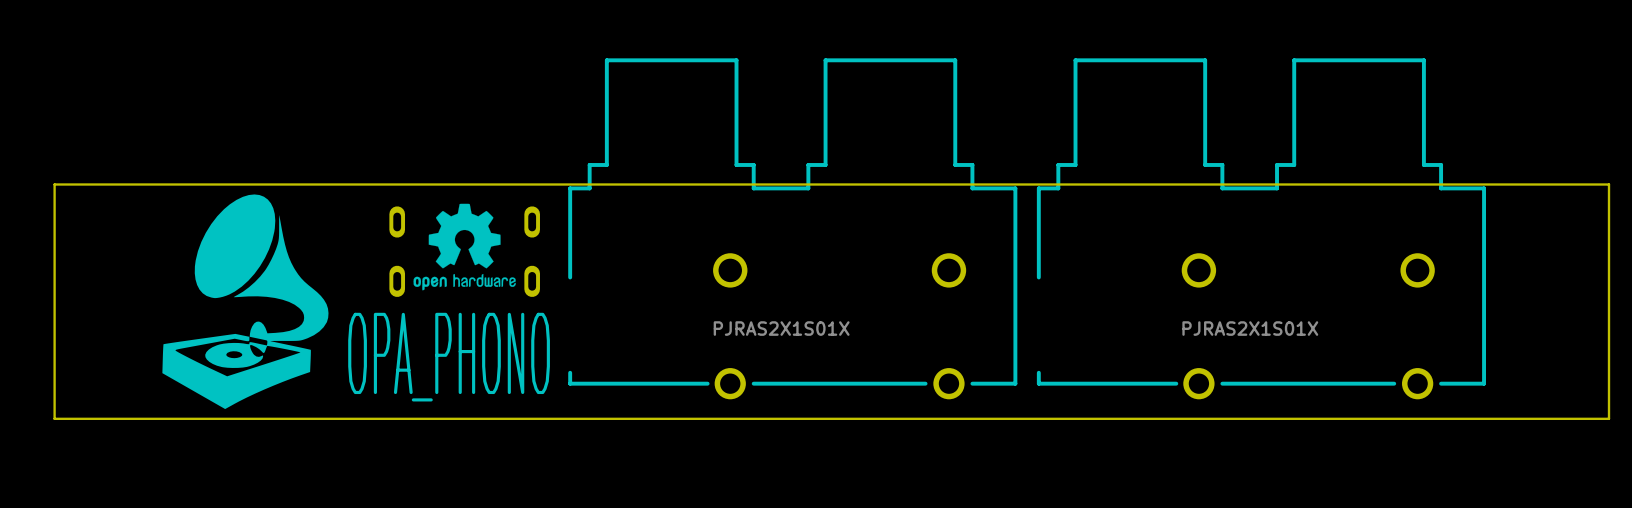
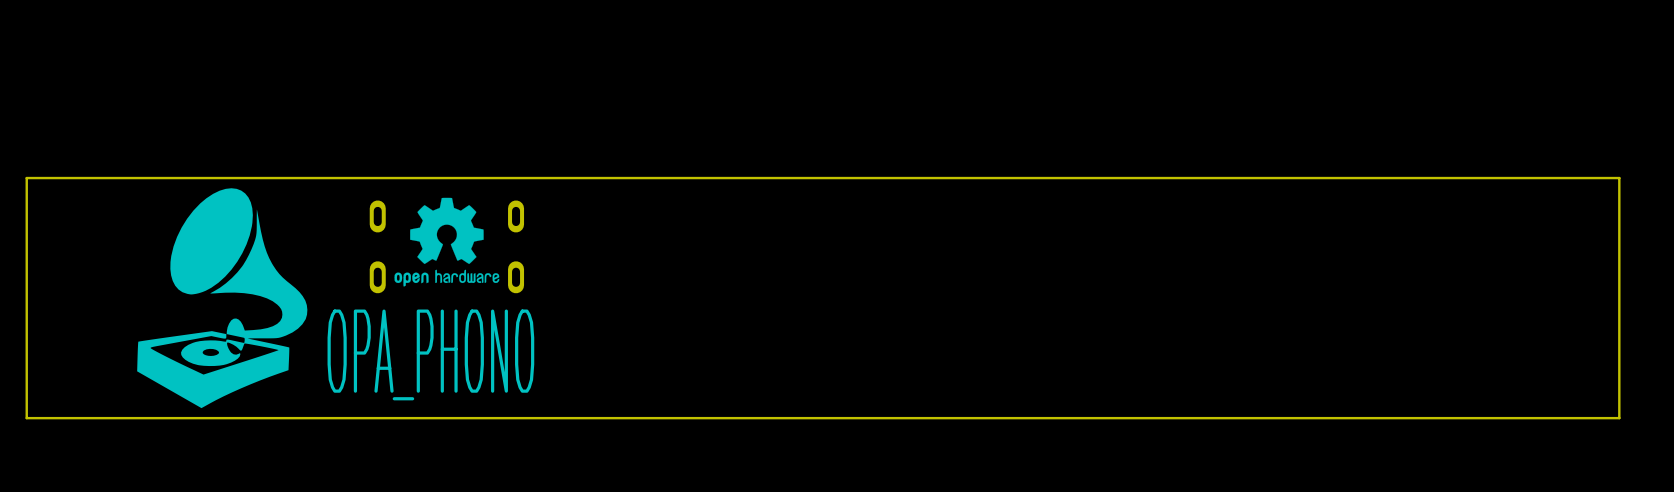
part: PJRAS2X1S01X (789, 228) -> none
part: PJRAS2X1S01X (1258, 228) -> none

